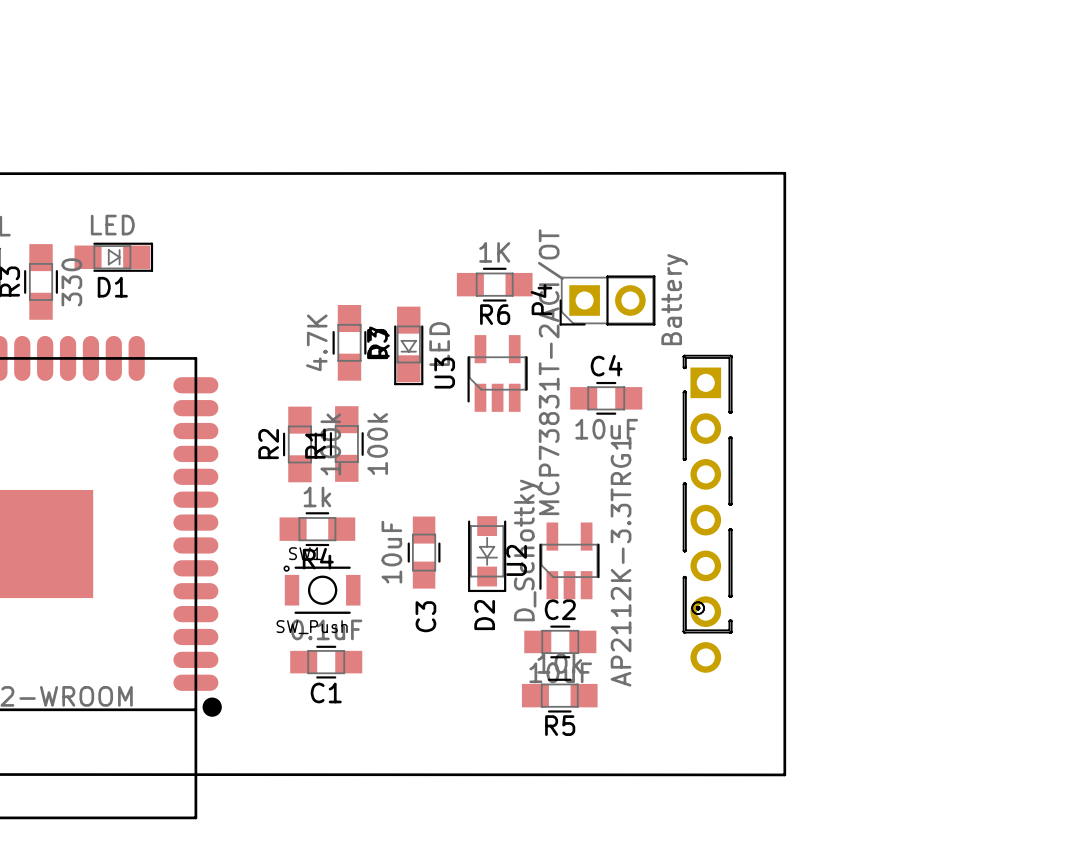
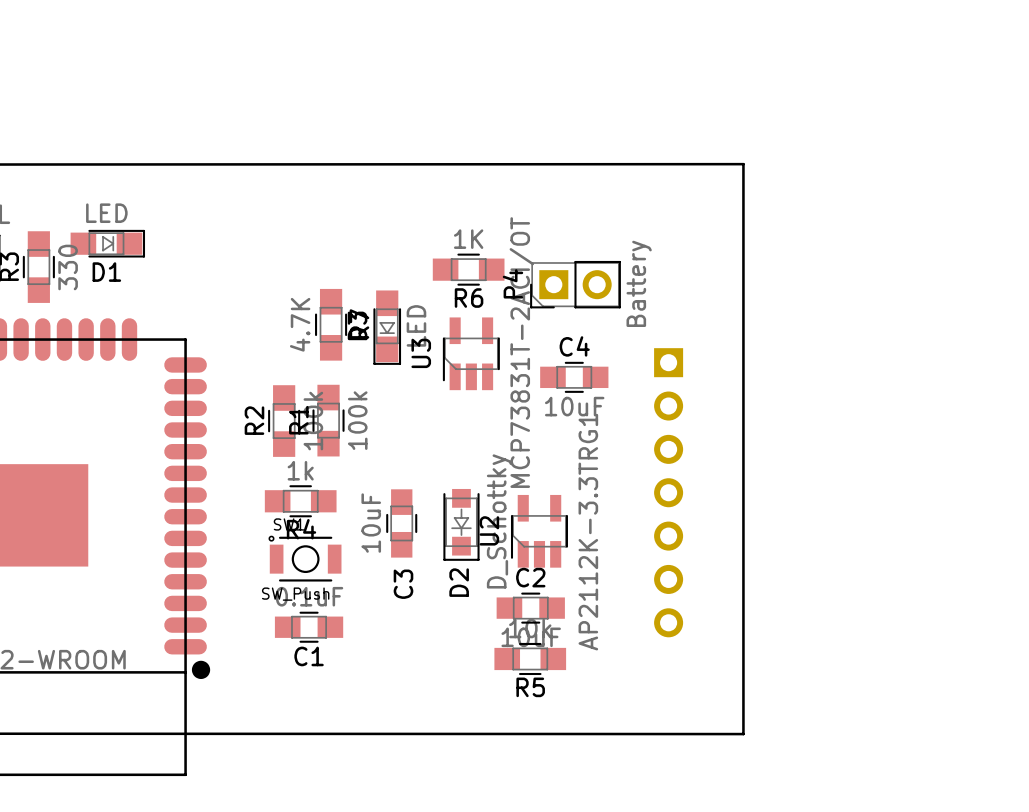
board edge: (684, 355) (731, 355) (731, 412) (729, 411) (729, 357) (685, 357) (684, 368) (683, 356) -> none
board edge: (684, 391) (683, 458) (684, 459) (685, 392) (684, 391) -> none
board edge: (730, 437) (729, 503) (730, 505) (731, 438) (730, 437) -> none
board edge: (684, 483) (685, 484) (684, 551) (683, 550) (684, 483) -> none
board edge: (730, 529) (729, 595) (730, 597) (731, 530) (730, 529) -> none
board edge: (697, 602) (701, 603) (704, 608) (699, 614) (695, 613) (692, 608) (697, 602) -> none
board edge: (697, 606) (699, 607) (698, 609) (696, 608) (697, 606) -> none
board edge: (683, 631) (684, 576) (685, 630) (729, 630) (730, 620) (731, 631) -> none
board edge: (729, 632) (730, 632) -> none

